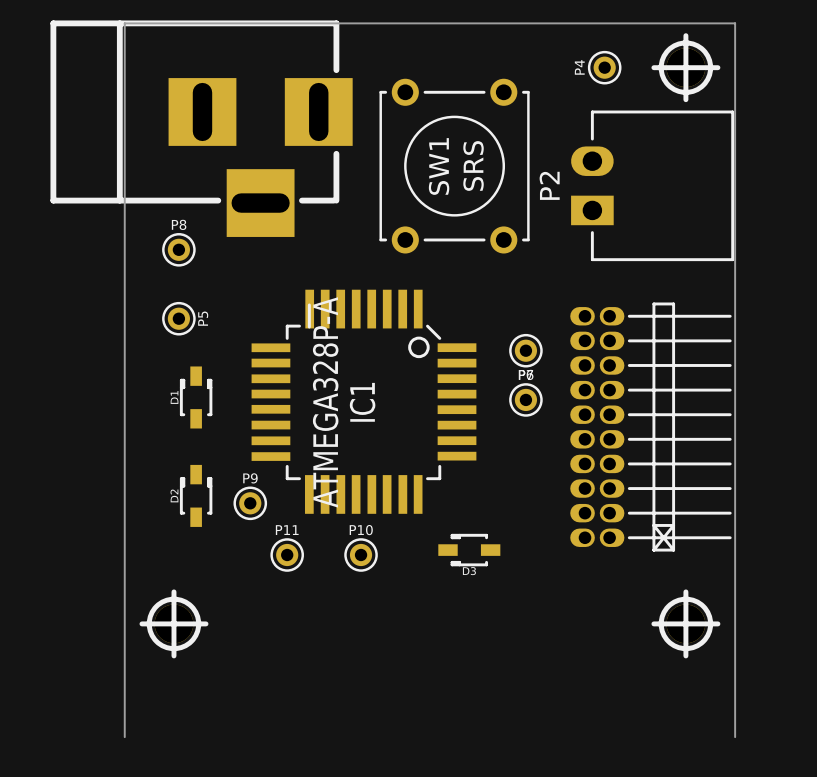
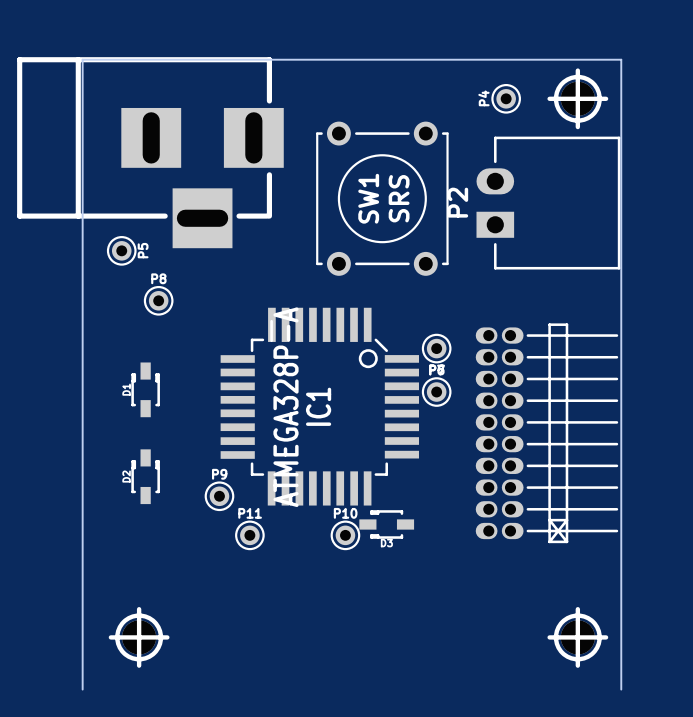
SW1 position: (454, 166) -> (382, 198)
P8 position: (178, 249) -> (158, 300)
P5 position: (178, 318) -> (121, 250)
IC1 position: (363, 401) -> (319, 406)
part position: (650, 427) -> (546, 433)
P9 position: (250, 503) -> (219, 496)
P11 position: (287, 555) -> (249, 535)
P10 position: (361, 555) -> (345, 535)
part position: (173, 623) -> (139, 637)
part position: (685, 623) -> (577, 637)

